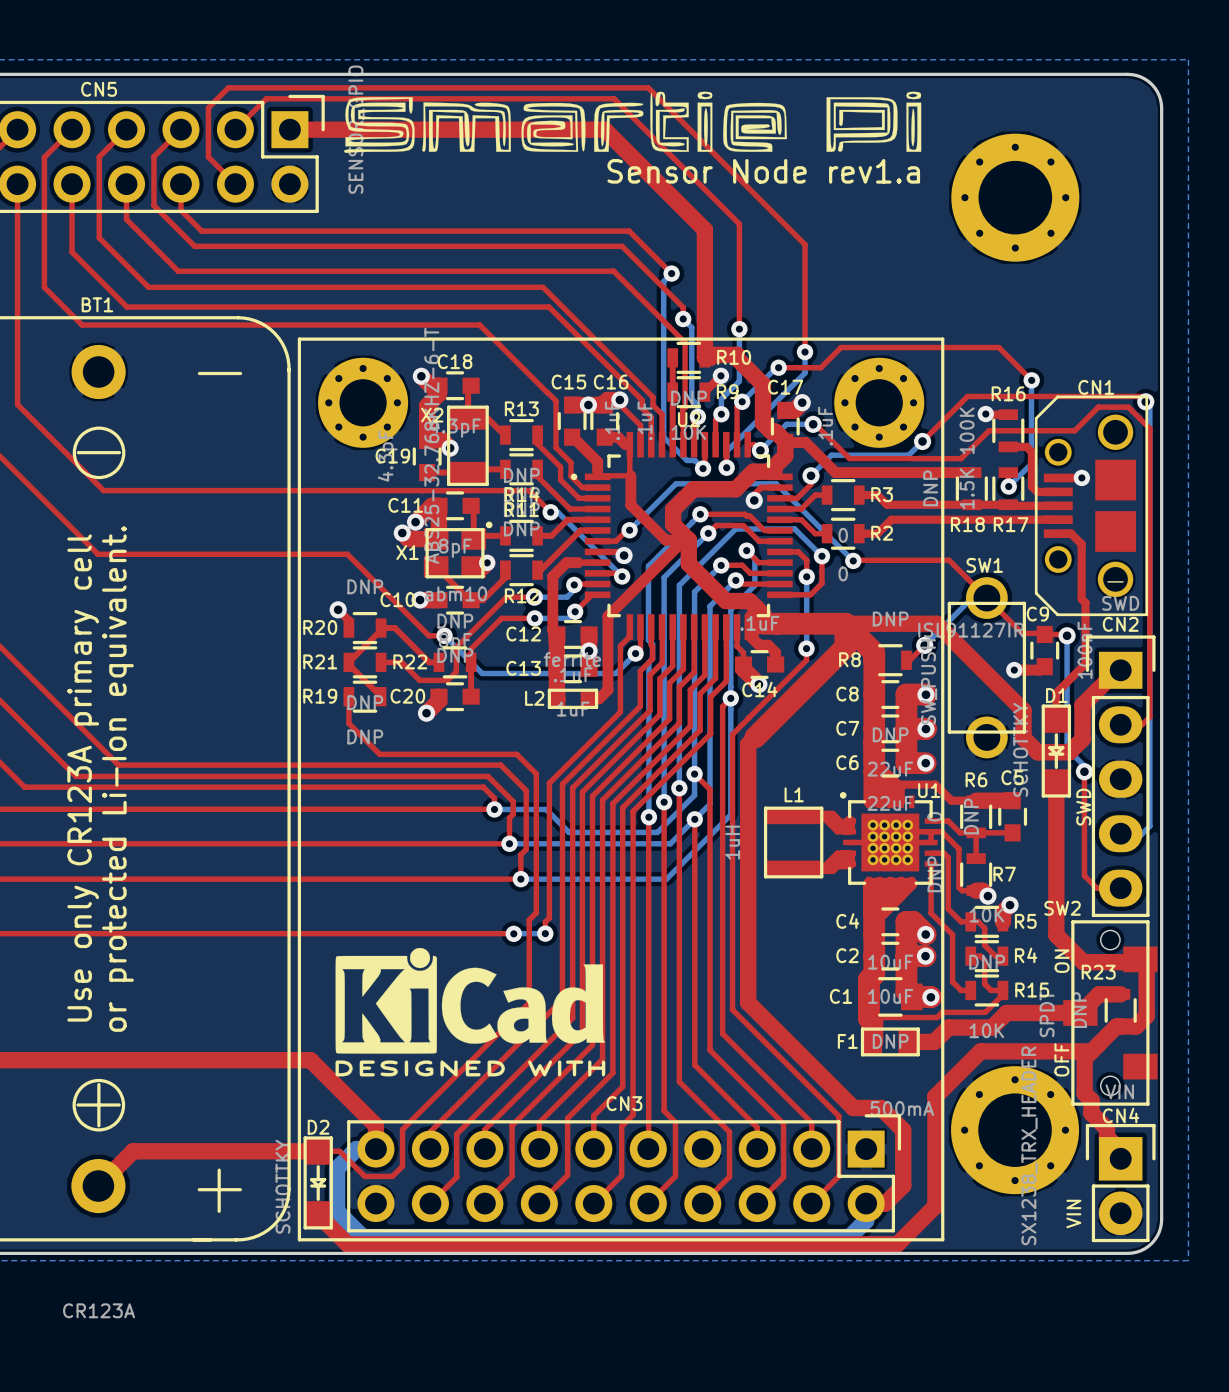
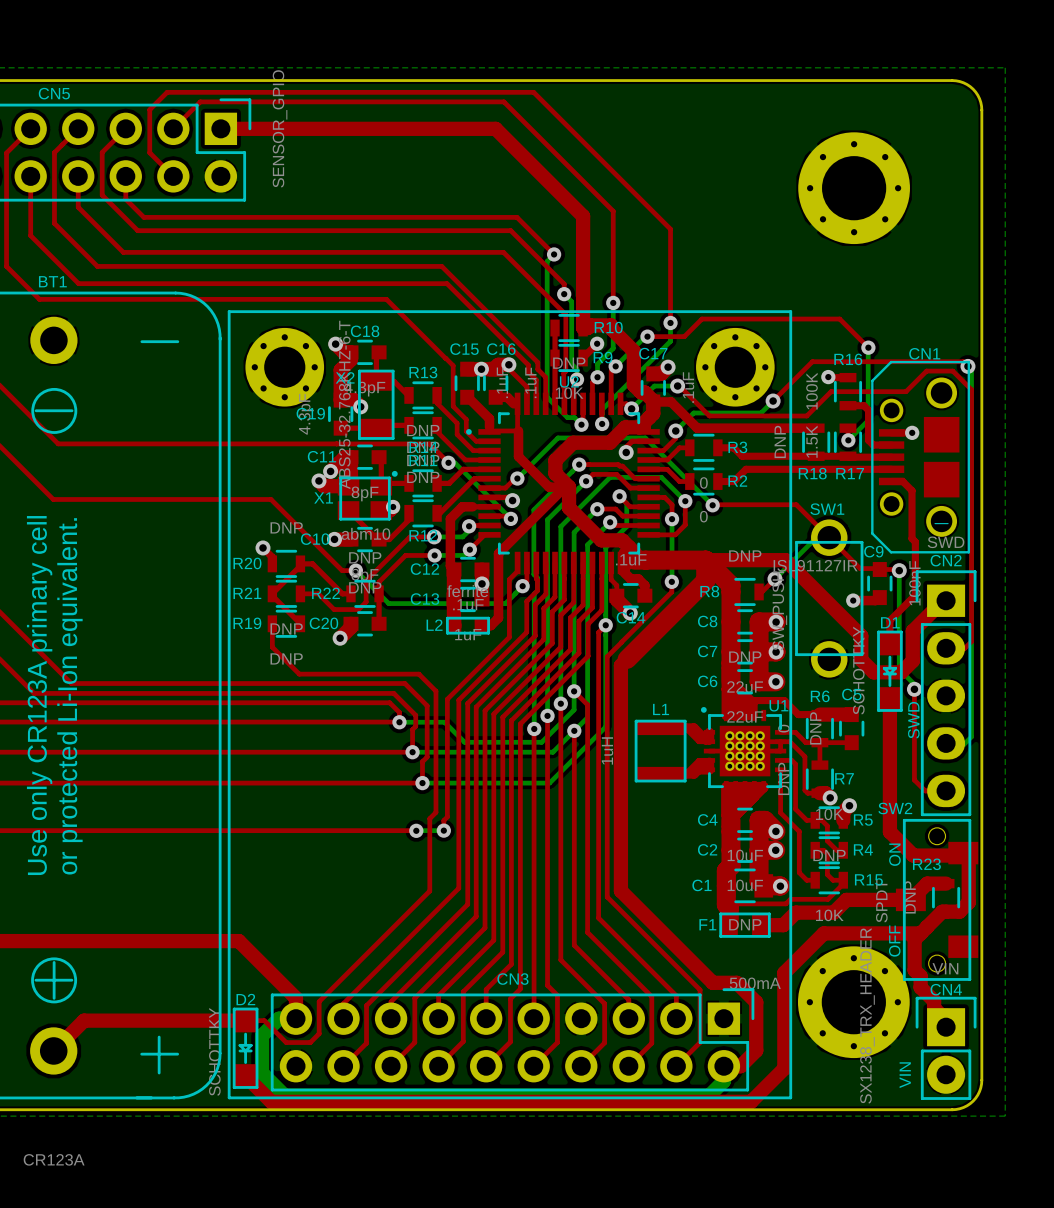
drawing: [343, 91, 922, 153] -> none
text: Sensor Node rev1.a (763, 171) -> none
drawing: [335, 947, 606, 1077] -> none

